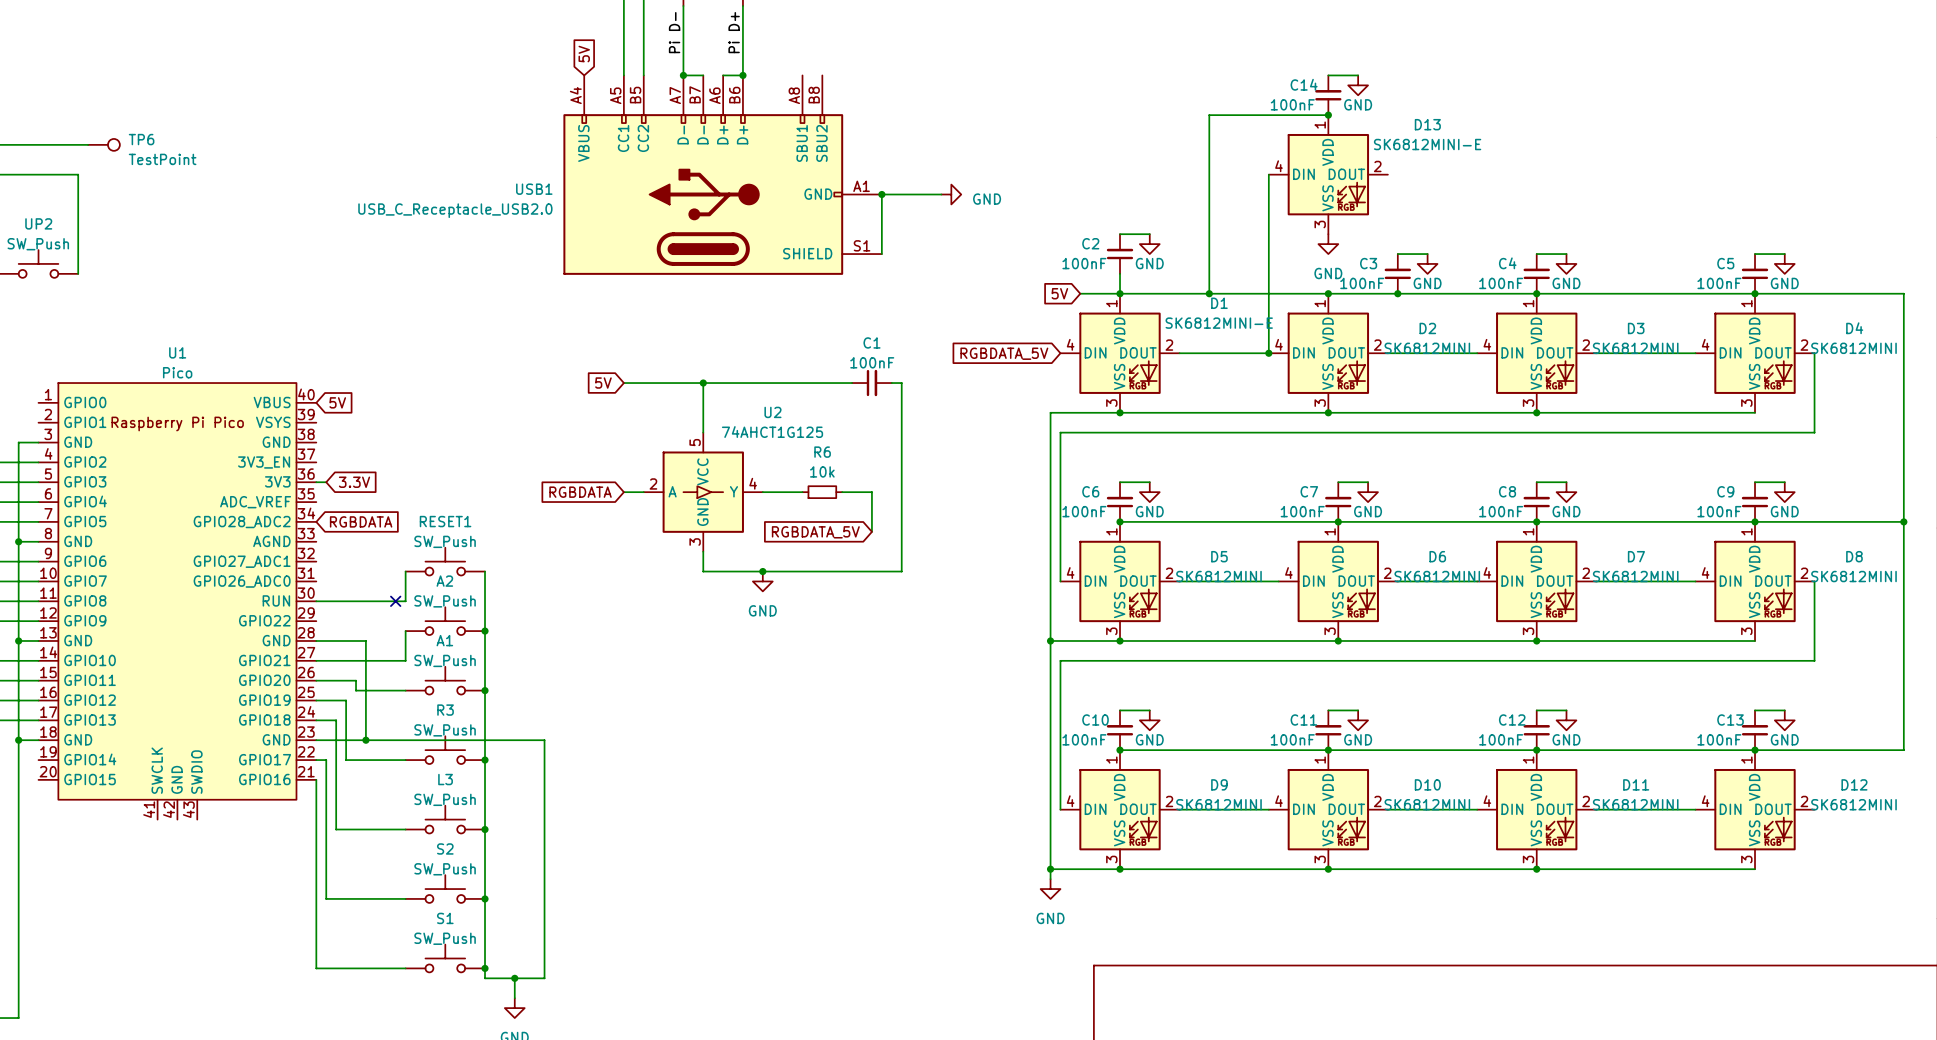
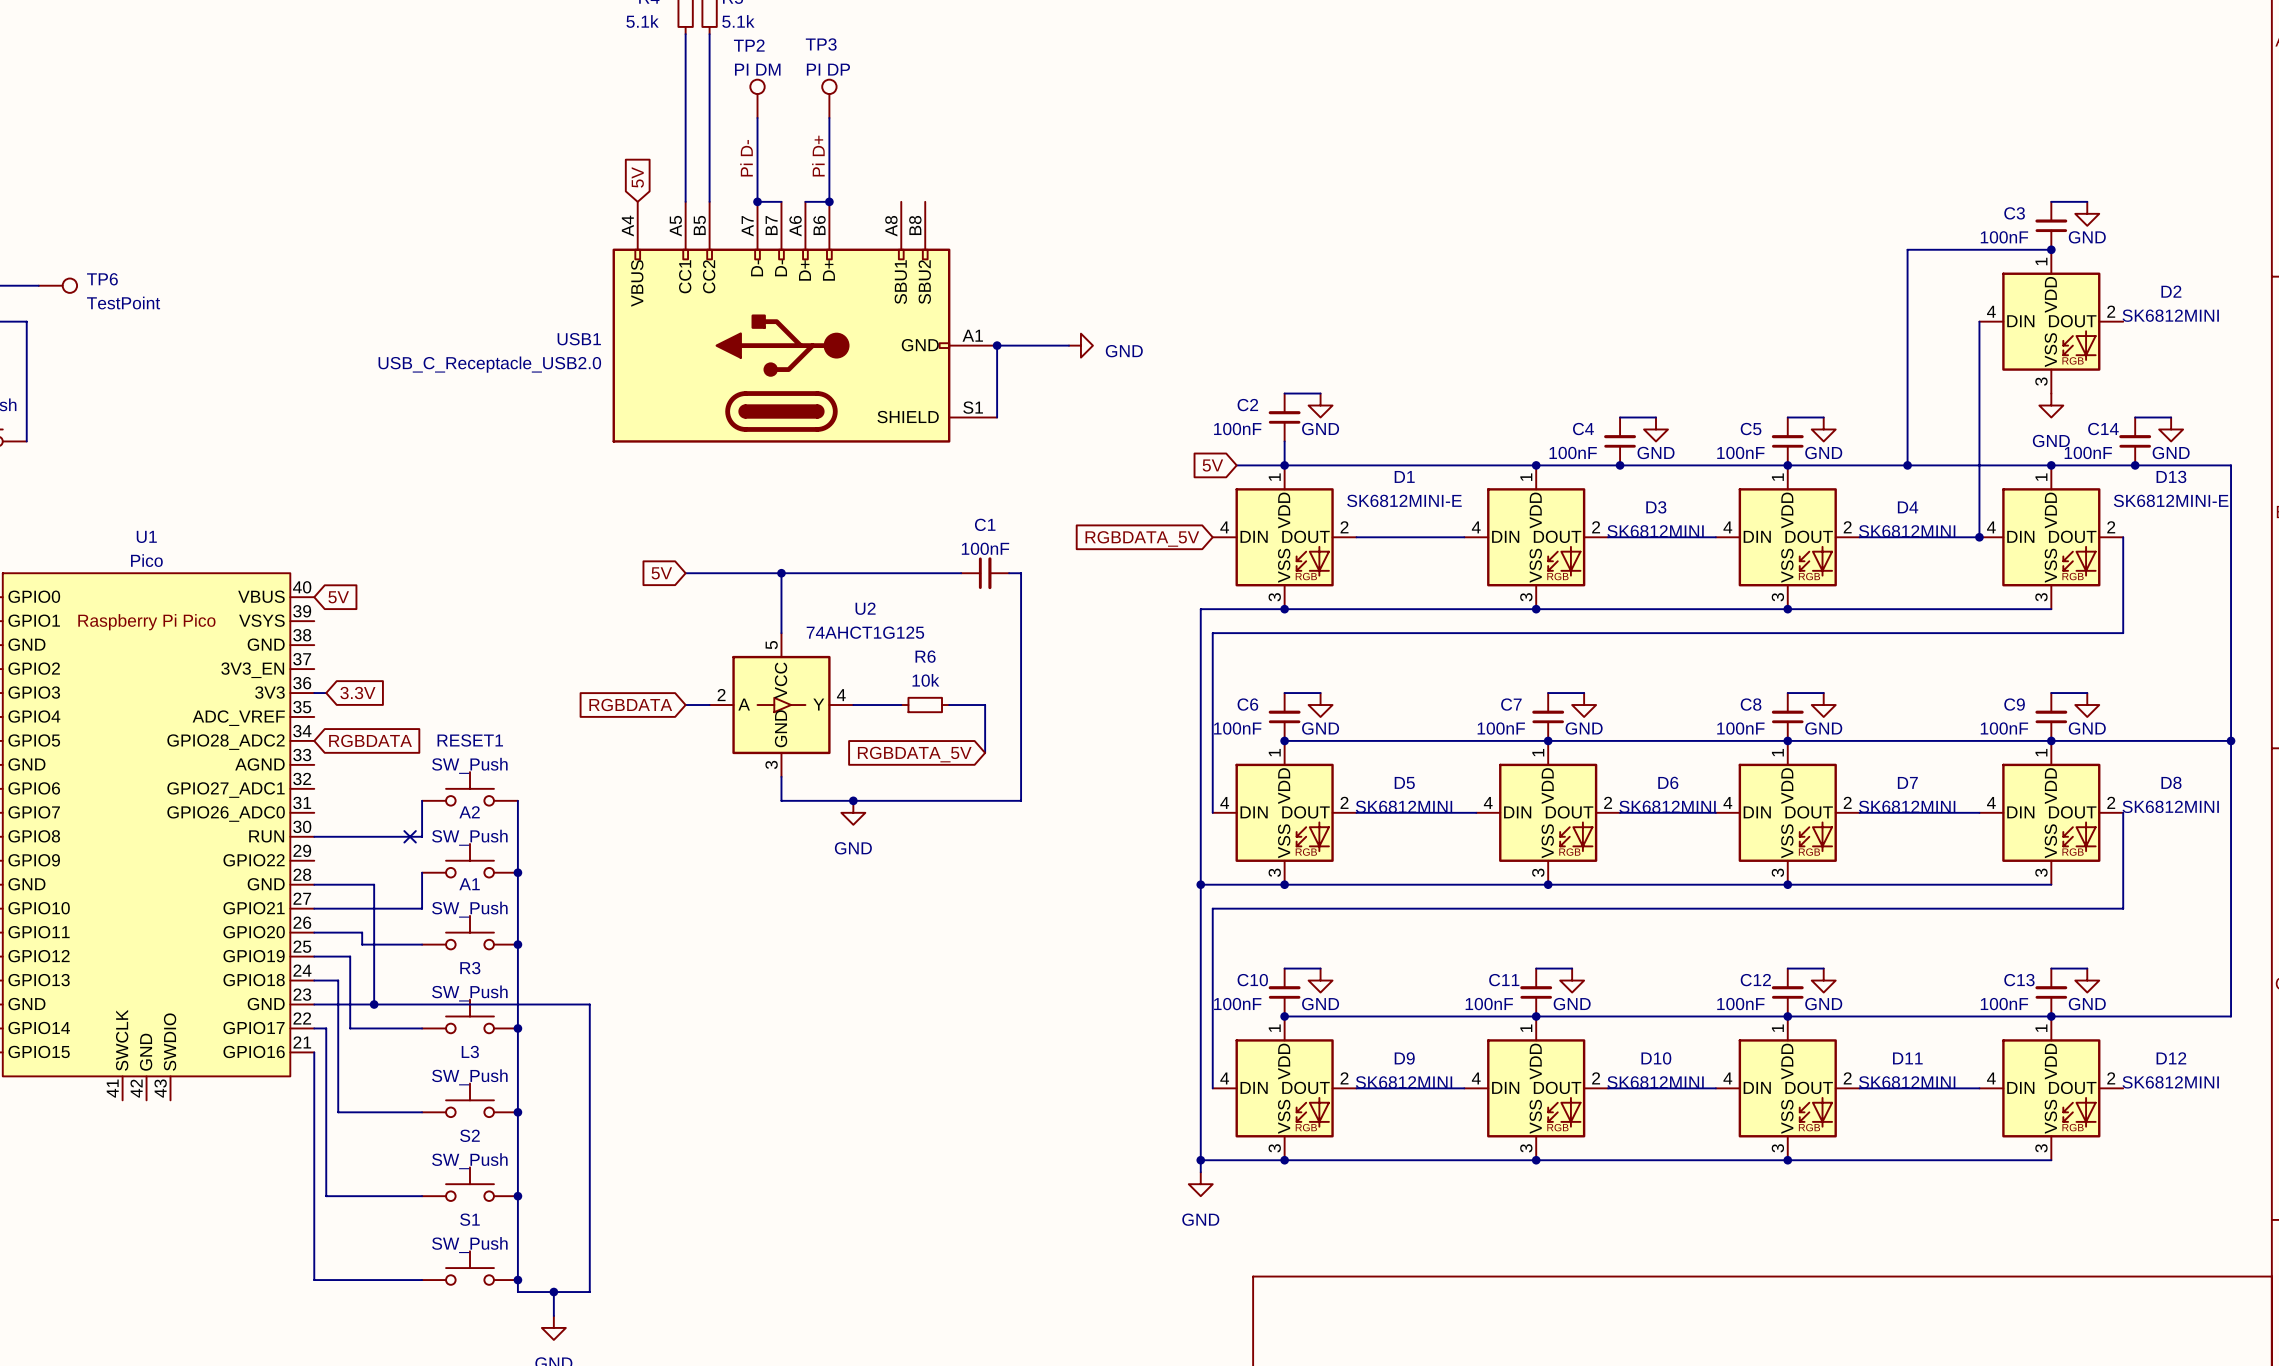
wire: (1328, 75) (1358, 75) -> none
wire: none -> (2051, 201) (2087, 201)
power symbol: GND (1358, 85) -> none
power symbol: none -> GND (2087, 213)
C14 position: (1328, 95) -> (2135, 441)
C3: none -> 100nF (2051, 225)
wire: (1328, 115) (1209, 115) (1209, 293) -> none
junction: (1328, 115) -> none
wire: none -> (2051, 249) (1907, 249) (1907, 465)
junction: none -> (2051, 249)
wire: (1268, 174) (1268, 353) -> none
D13: SK6812MINI-E (1328, 174) -> none
wire: none -> (1979, 321) (1979, 537)
D2: none -> SK6812MINI (2051, 321)
power symbol: GND (1328, 244) -> none
power symbol: none -> GND (2051, 405)
wire: (1755, 254) (1784, 254) -> (2135, 417) (2171, 417)
C3 name: C3 (1368, 263) -> C4 (1583, 429)
C4 name: C4 (1507, 263) -> C5 (1751, 429)
power symbol: GND (1784, 263) -> none
power symbol: none -> GND (2171, 429)
C5: 100nF (1755, 273) -> none
junction: (1209, 293) -> none
junction: none -> (1907, 465)
junction: none -> (2135, 465)
D2 name: D2 (1427, 328) -> D3 (1656, 507)
D3 name: D3 (1636, 328) -> D4 (1908, 507)
D4 name: D4 (1854, 328) -> D13 (2171, 476)
D4 value: SK6812MINI (1853, 348) -> SK6812MINI-E (2171, 500)
junction: (1268, 353) -> none
junction: none -> (1979, 537)

